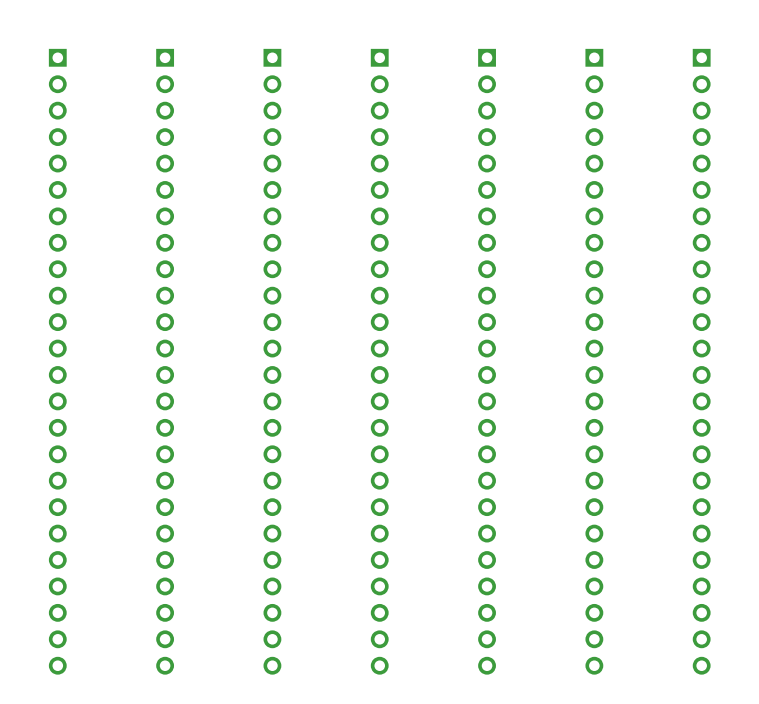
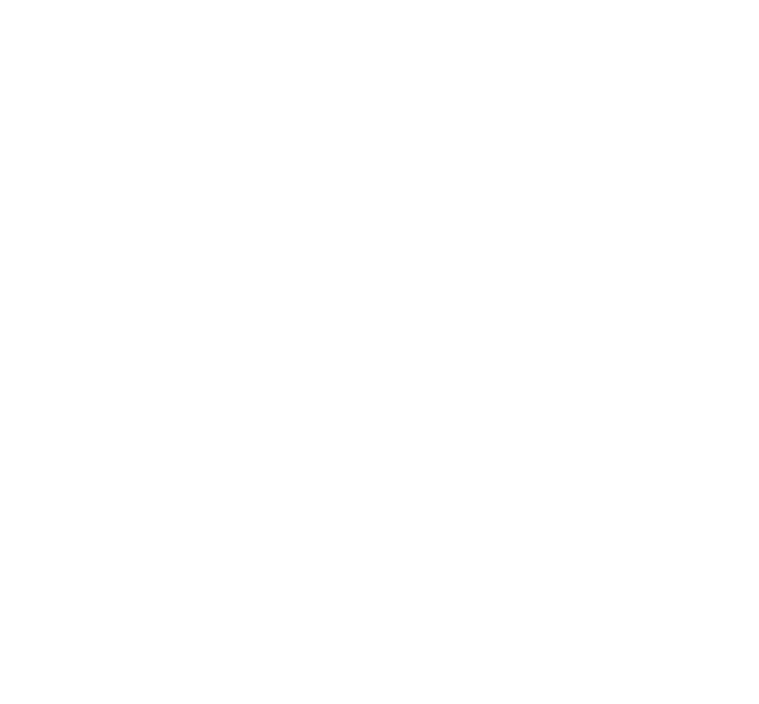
part: (57, 361) -> none
part: (165, 361) -> none
part: (272, 361) -> none
part: (379, 361) -> none
part: (487, 361) -> none
part: (594, 361) -> none
part: (701, 361) -> none

